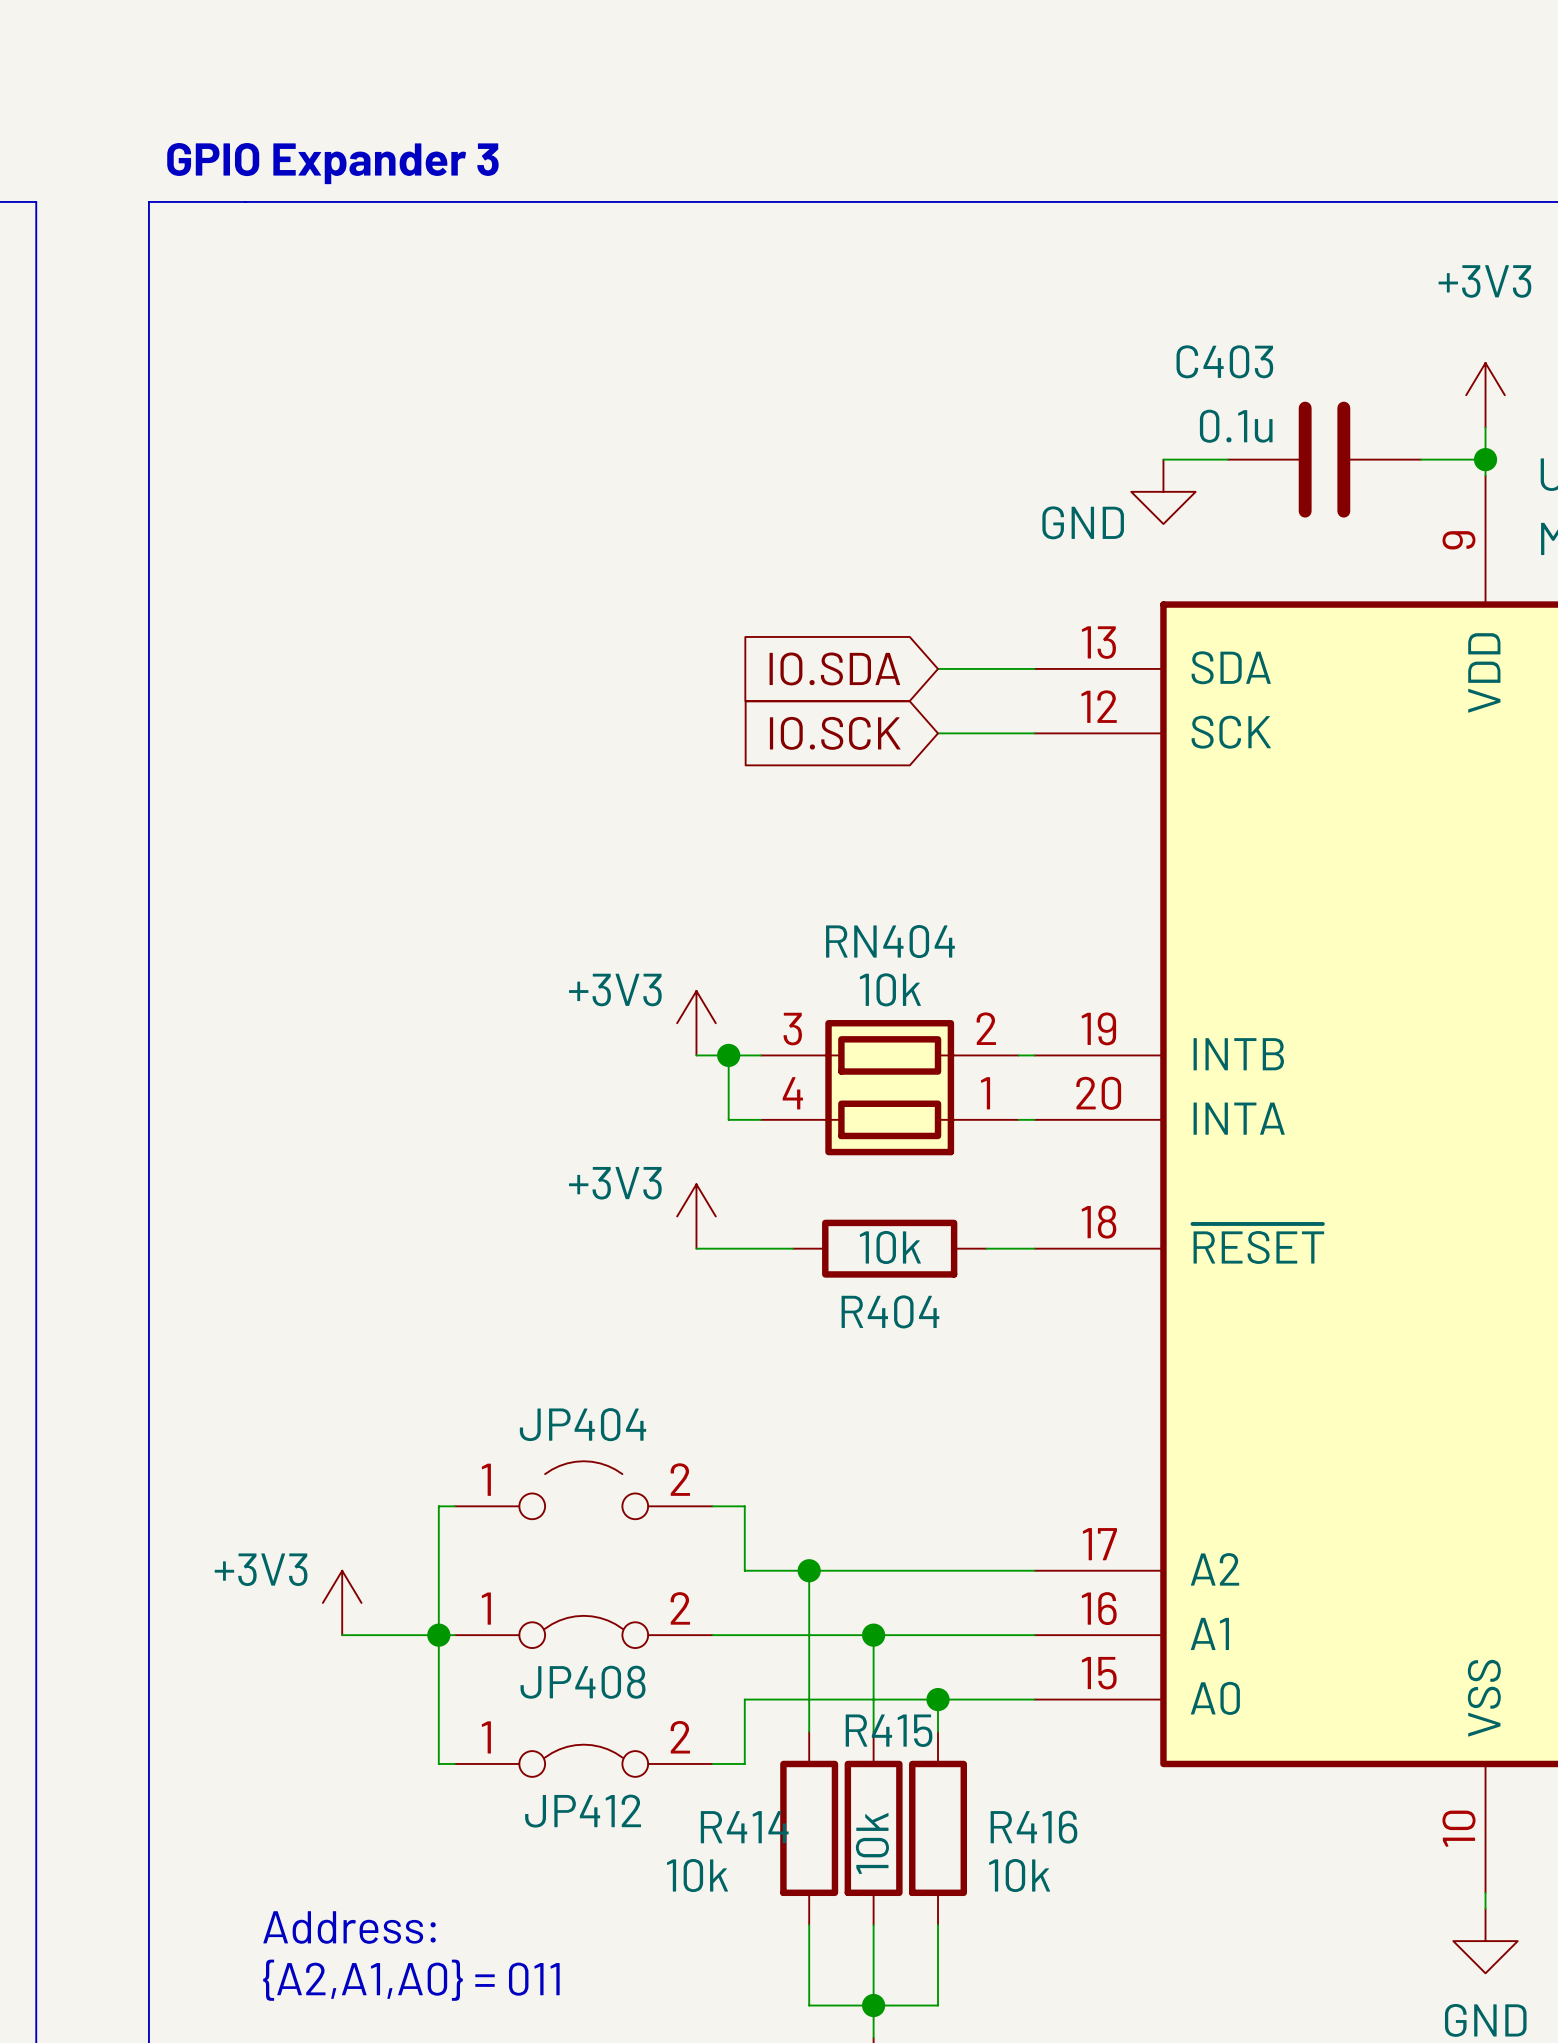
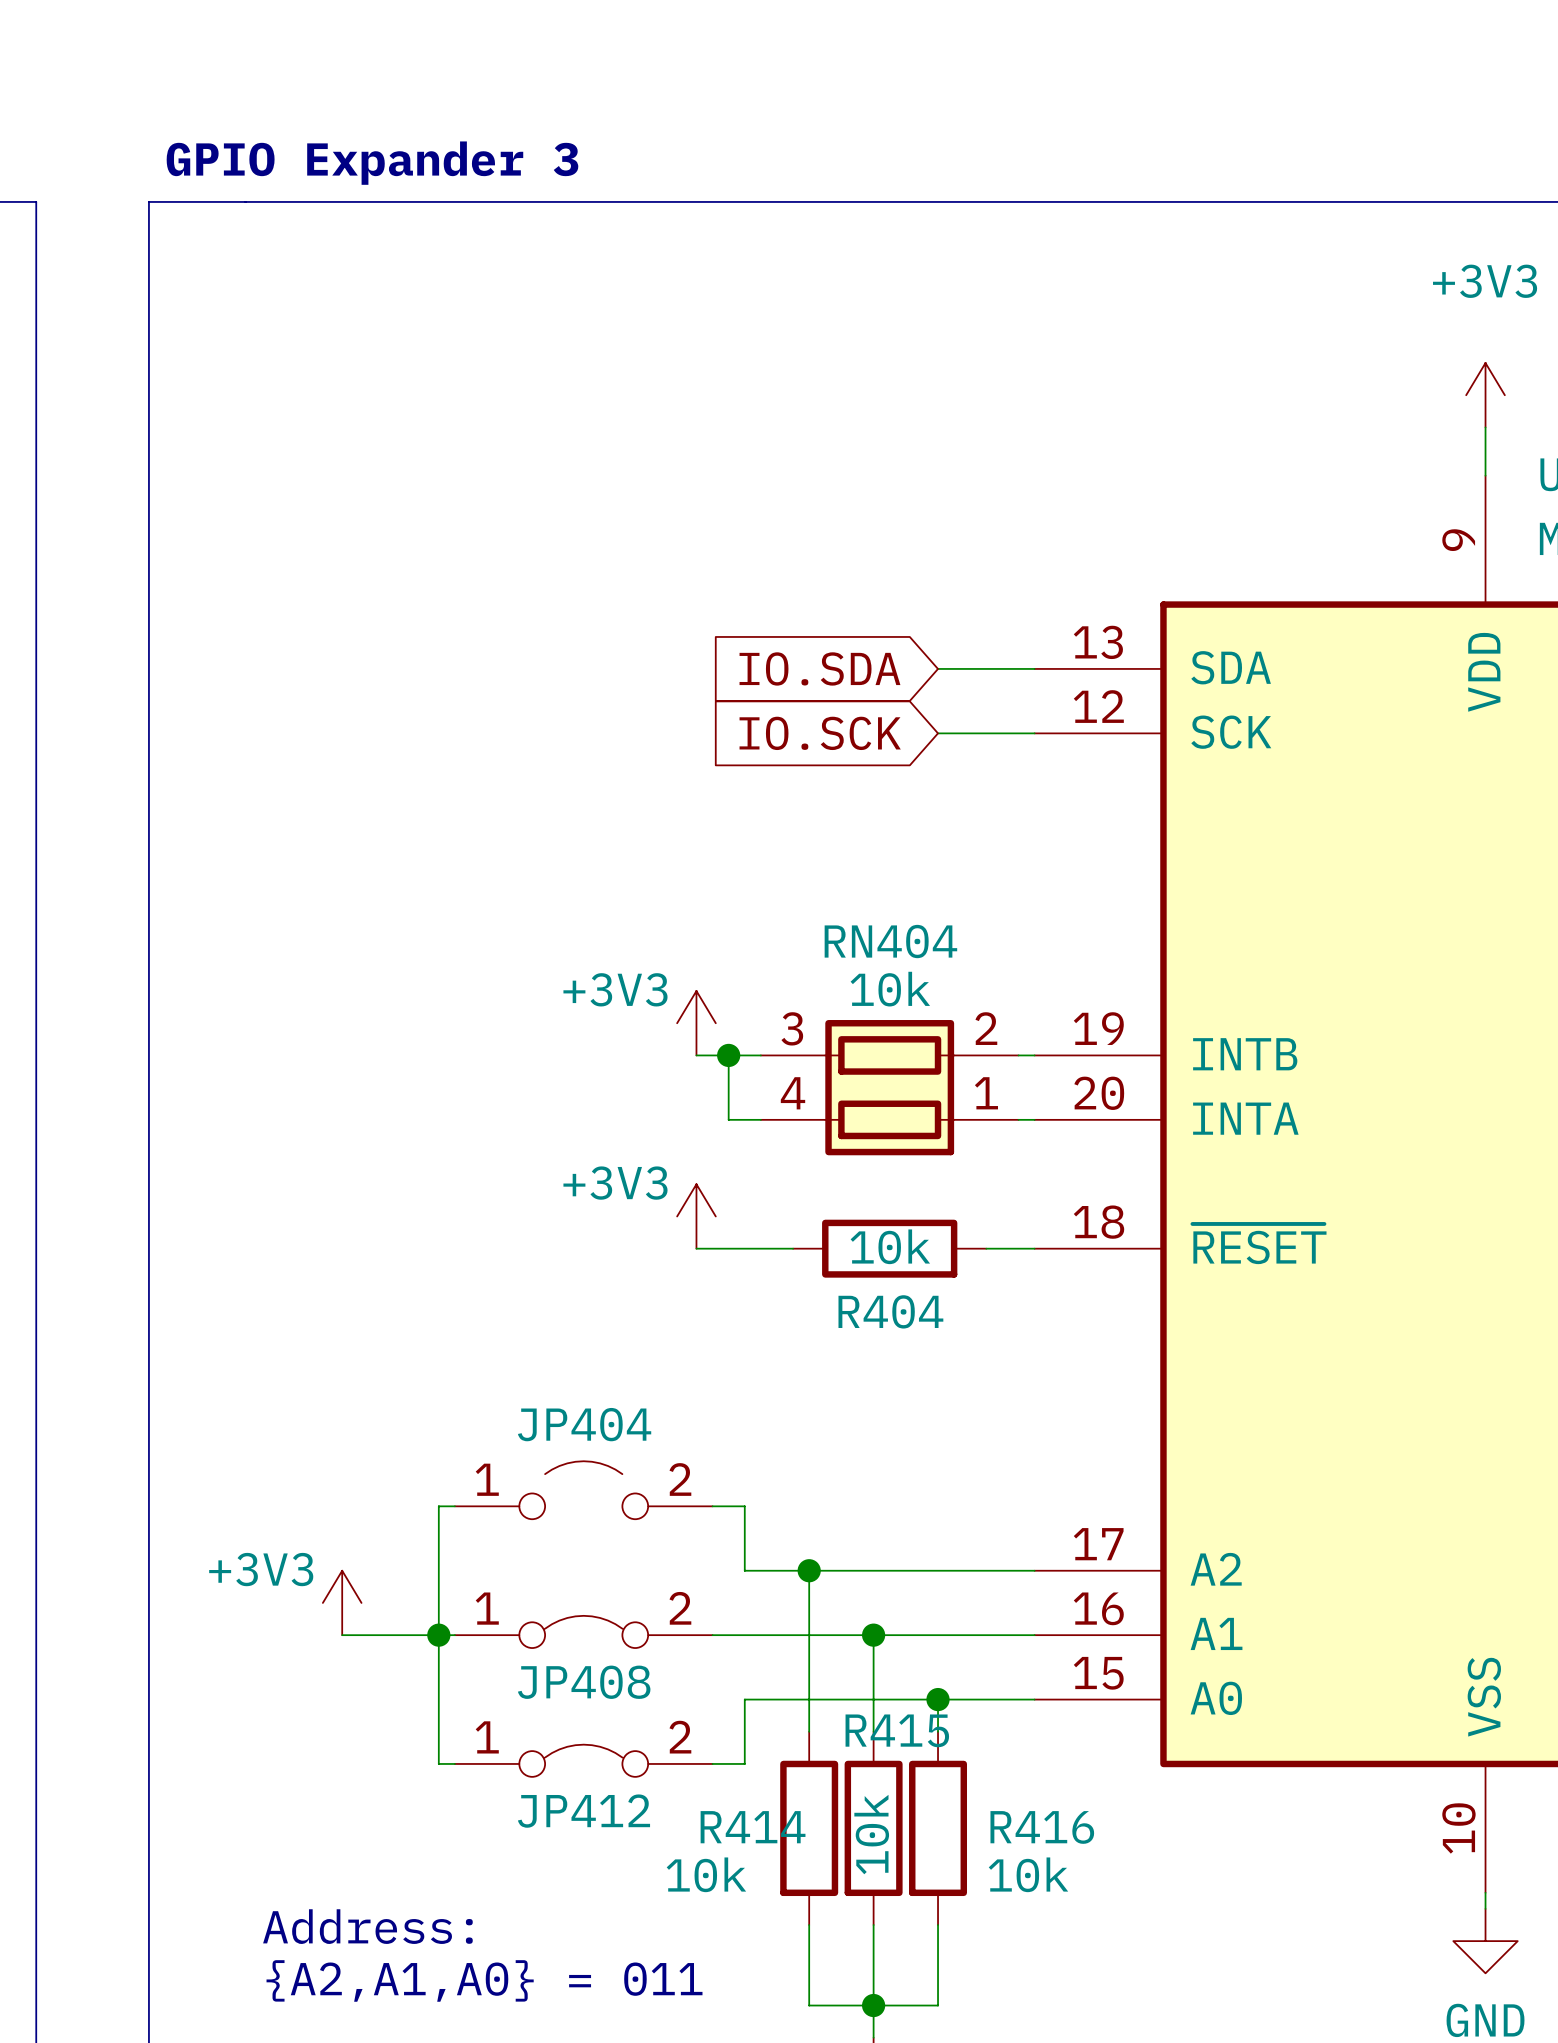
wire: (1163, 459) (1227, 459) -> none
C403: 0.1u (1324, 459) -> none
wire: (1421, 459) (1485, 459) -> none
junction: (1485, 459) -> none
power symbol: GND (1163, 491) -> none

